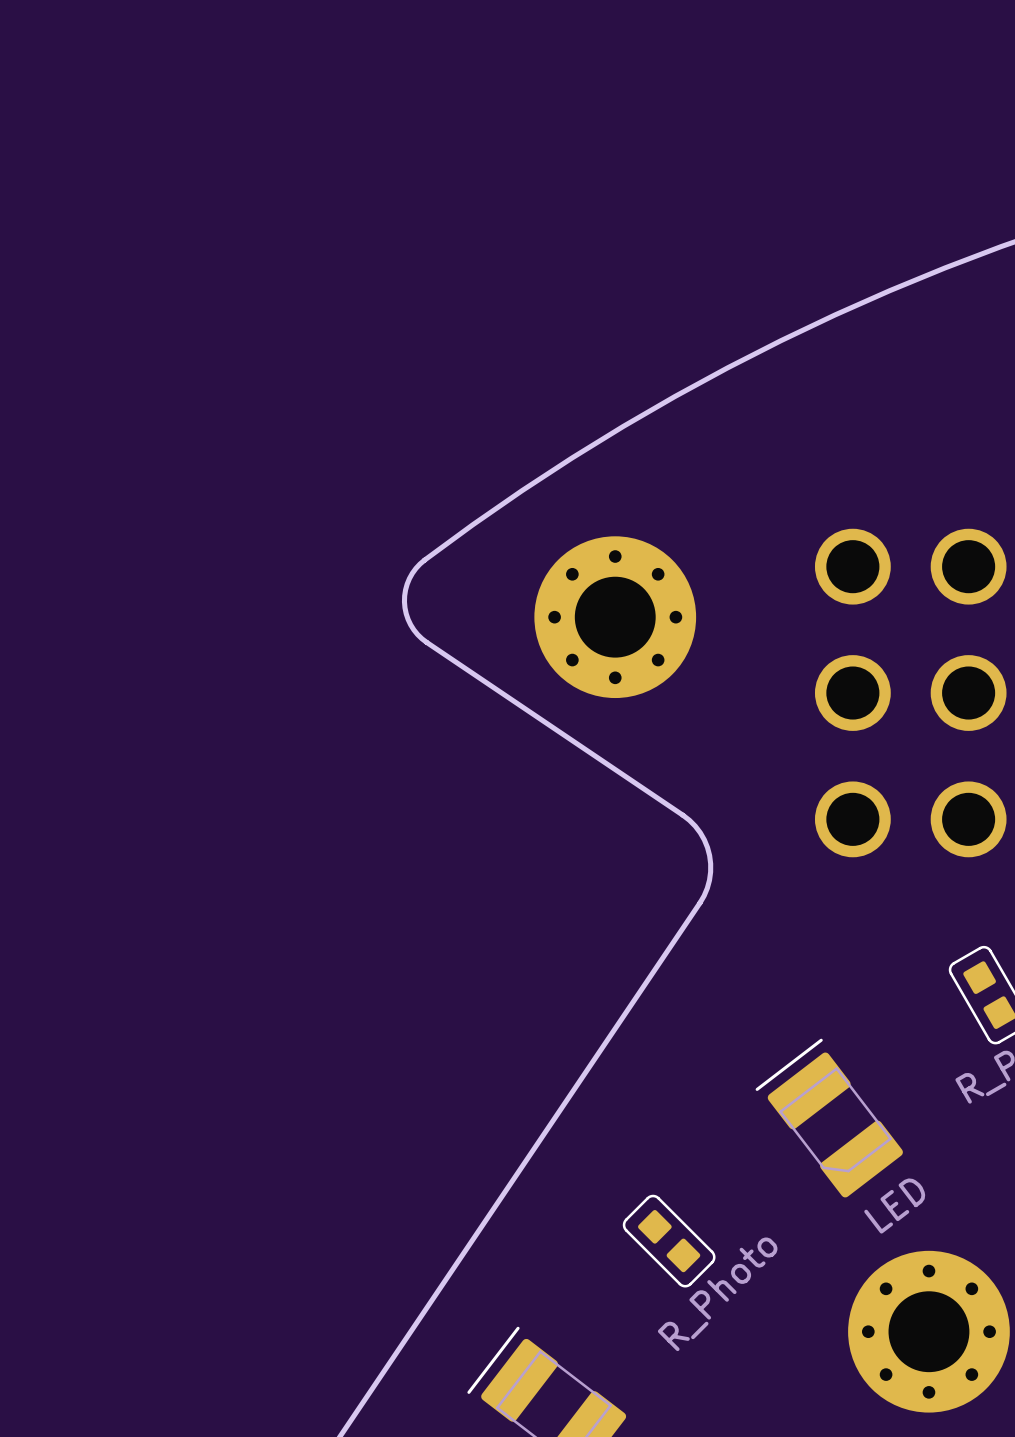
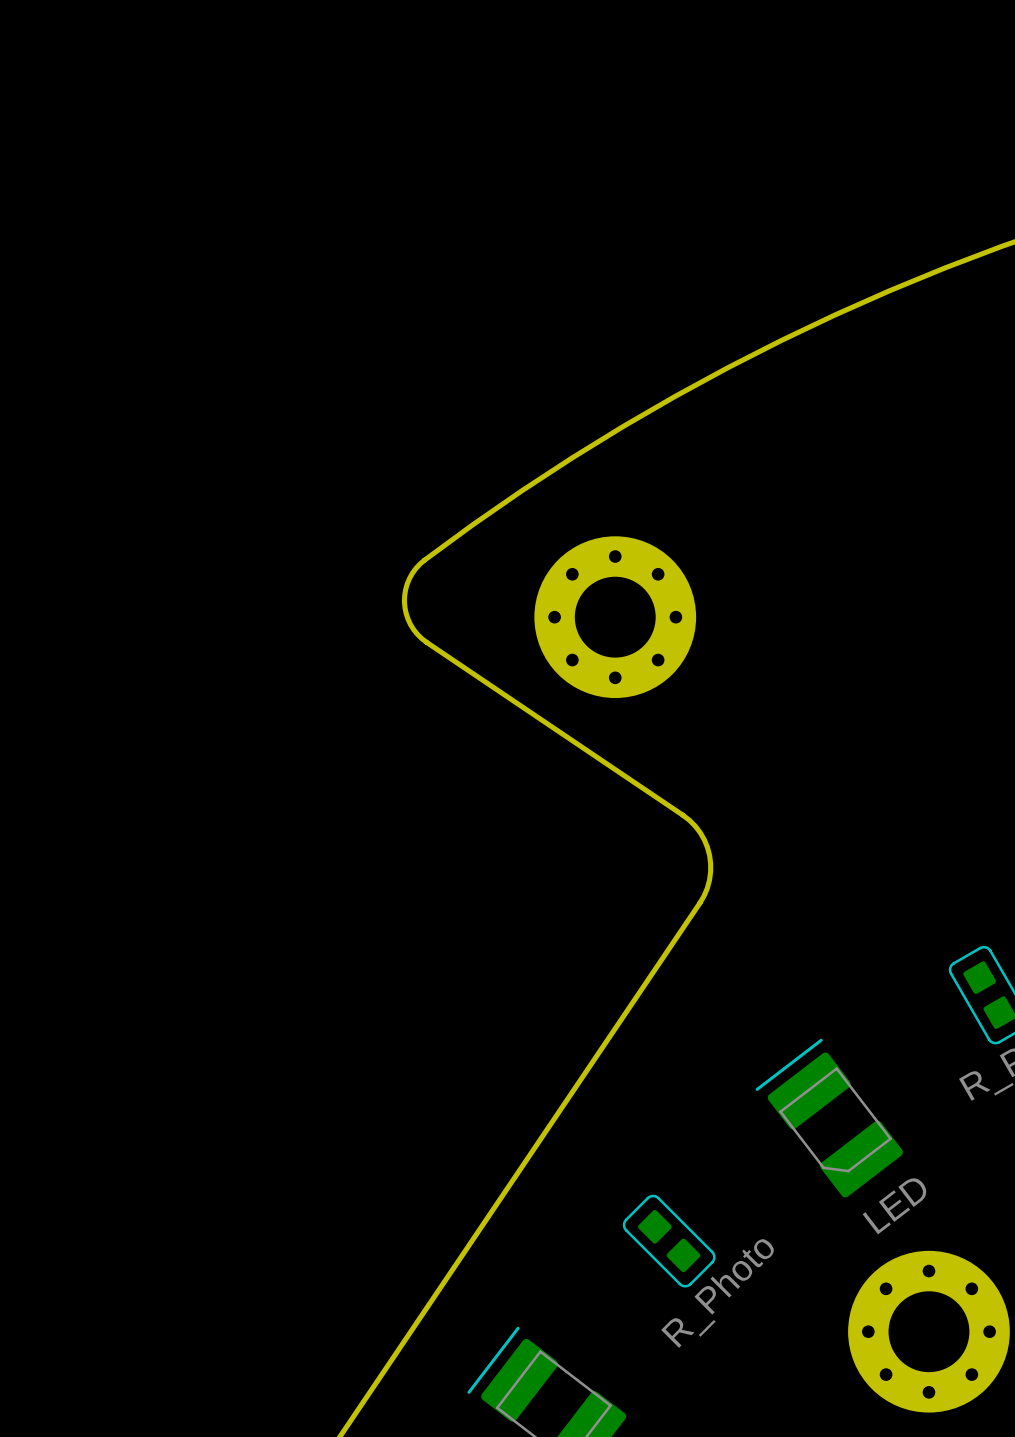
part: (910, 566) -> none
part: (910, 693) -> none
part: (910, 819) -> none

